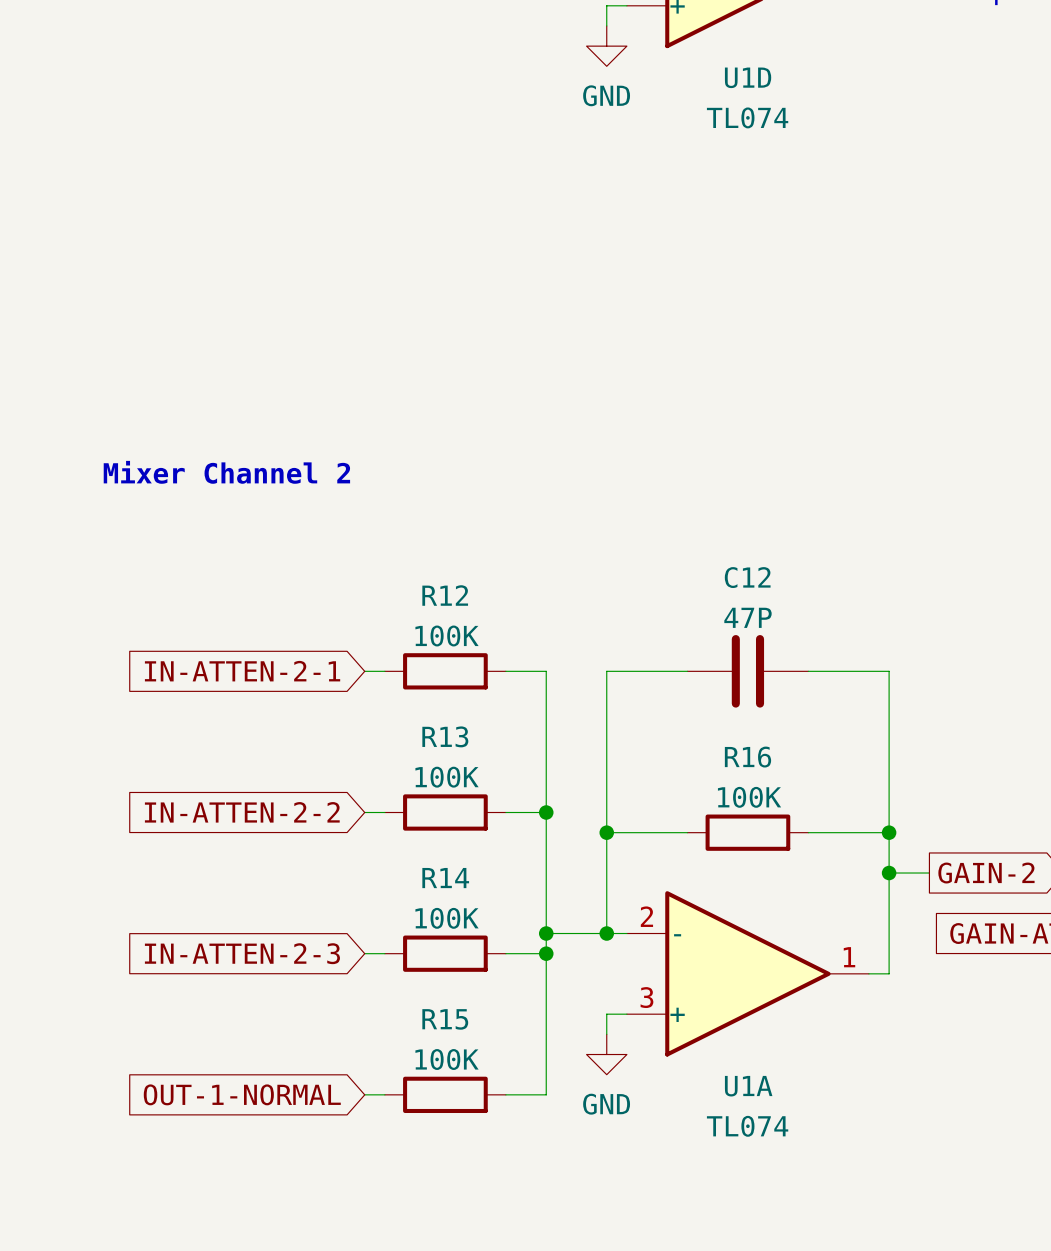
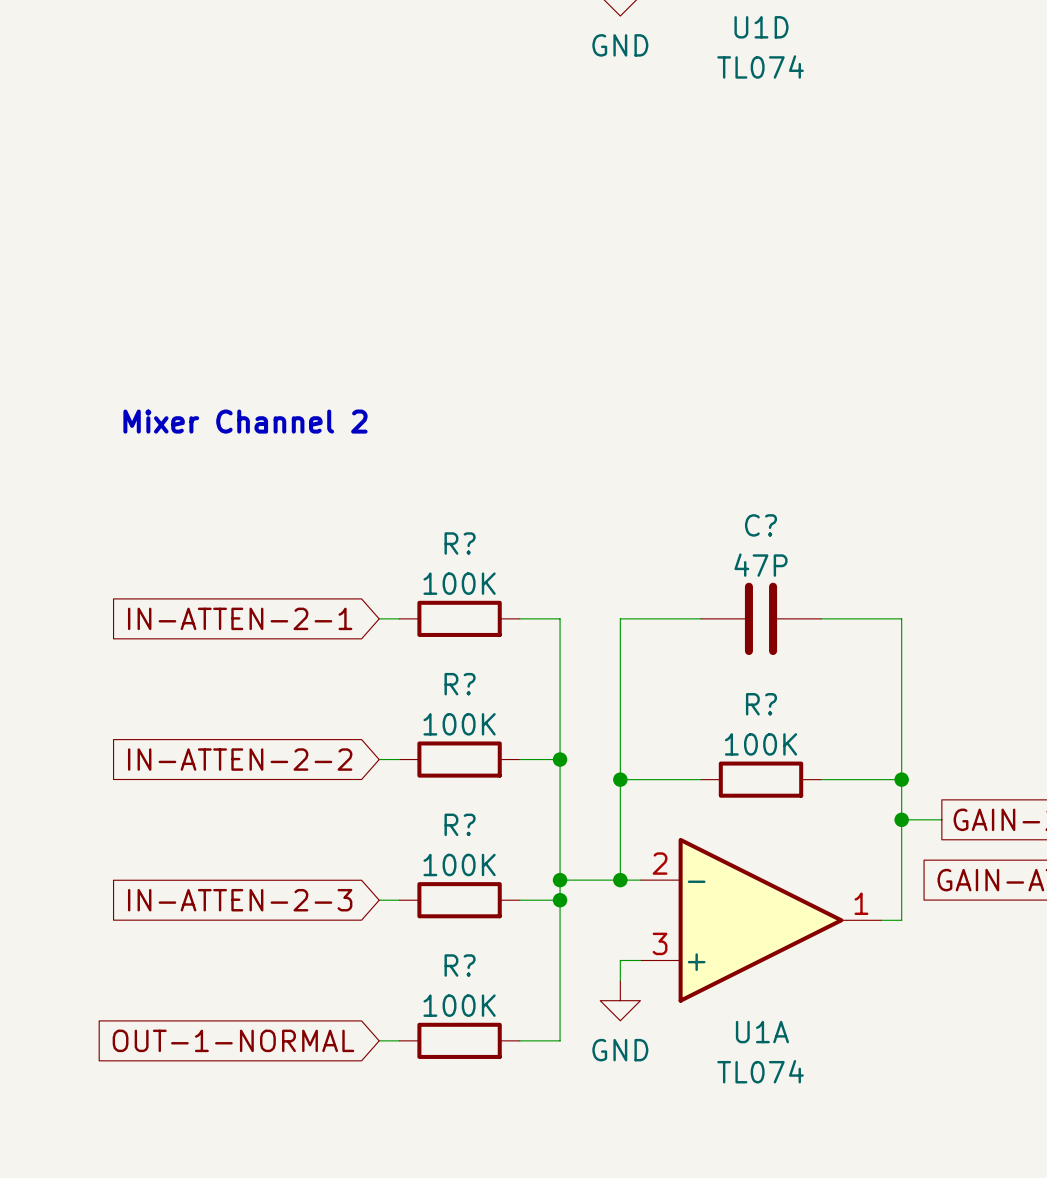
C12 name: C12 (747, 577) -> C? (761, 525)
R12 name: R12 (445, 595) -> R? (460, 543)
R13 name: R13 (445, 736) -> R? (460, 684)
R16 name: R16 (747, 757) -> R? (761, 704)
R14 name: R14 (445, 878) -> R? (460, 824)
R15 name: R15 (445, 1019) -> R? (460, 965)

